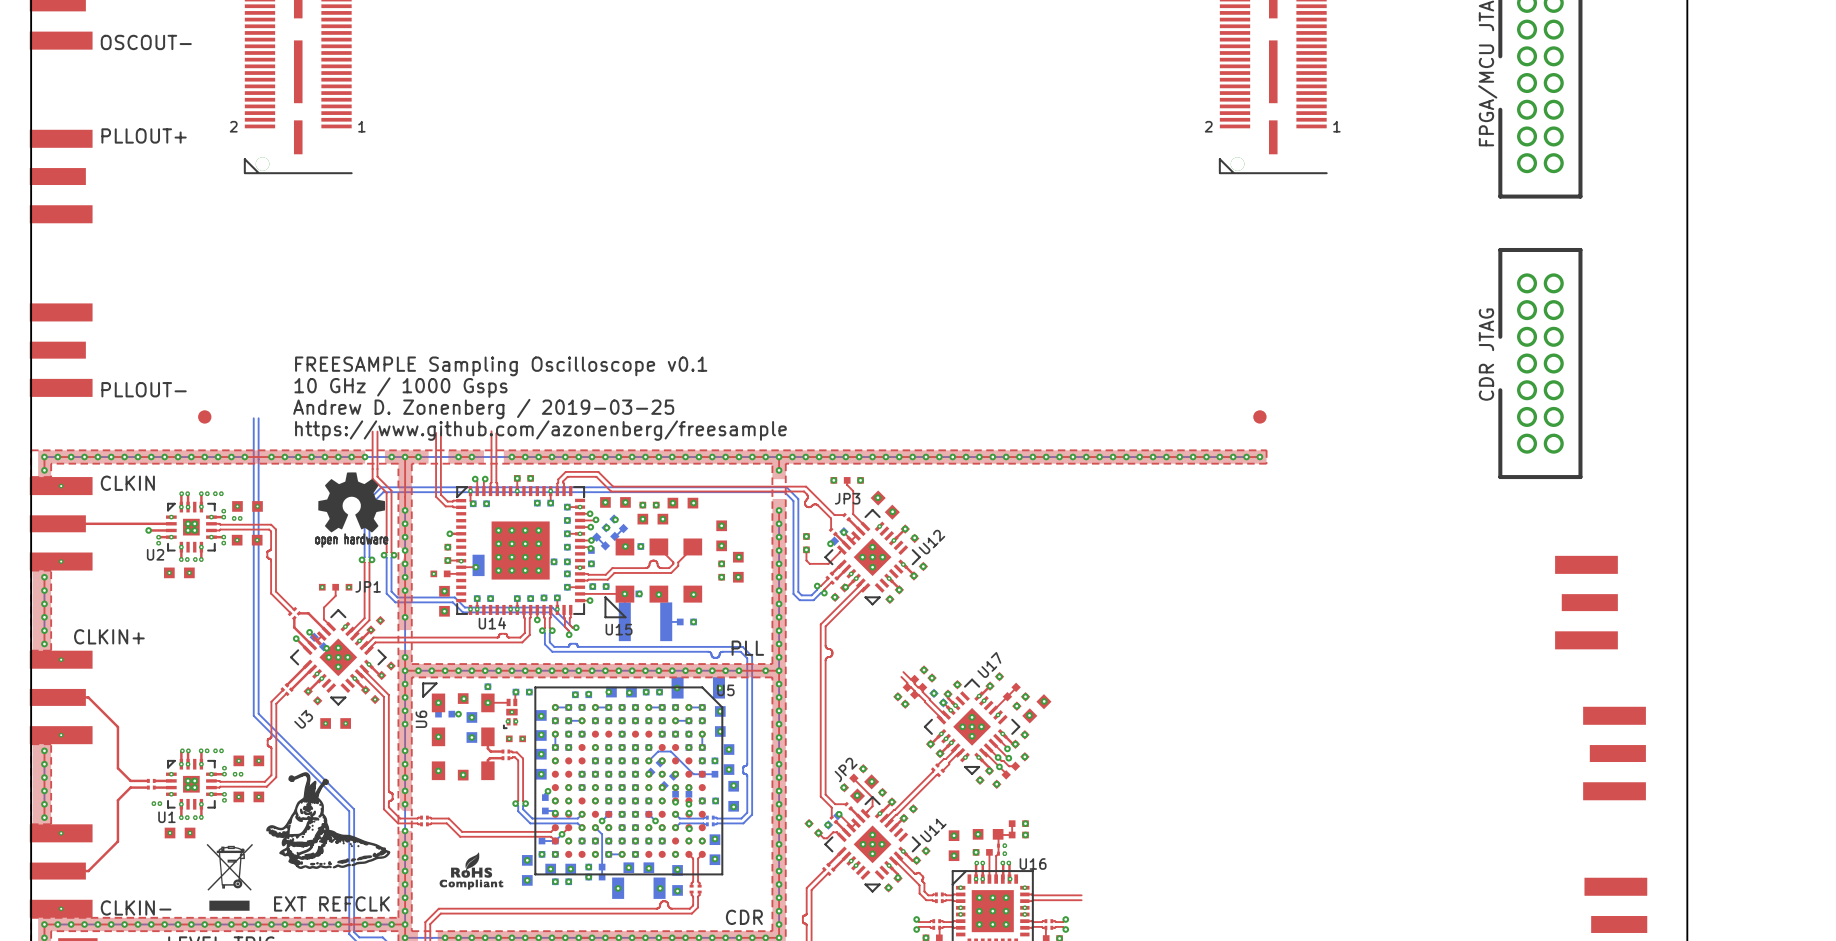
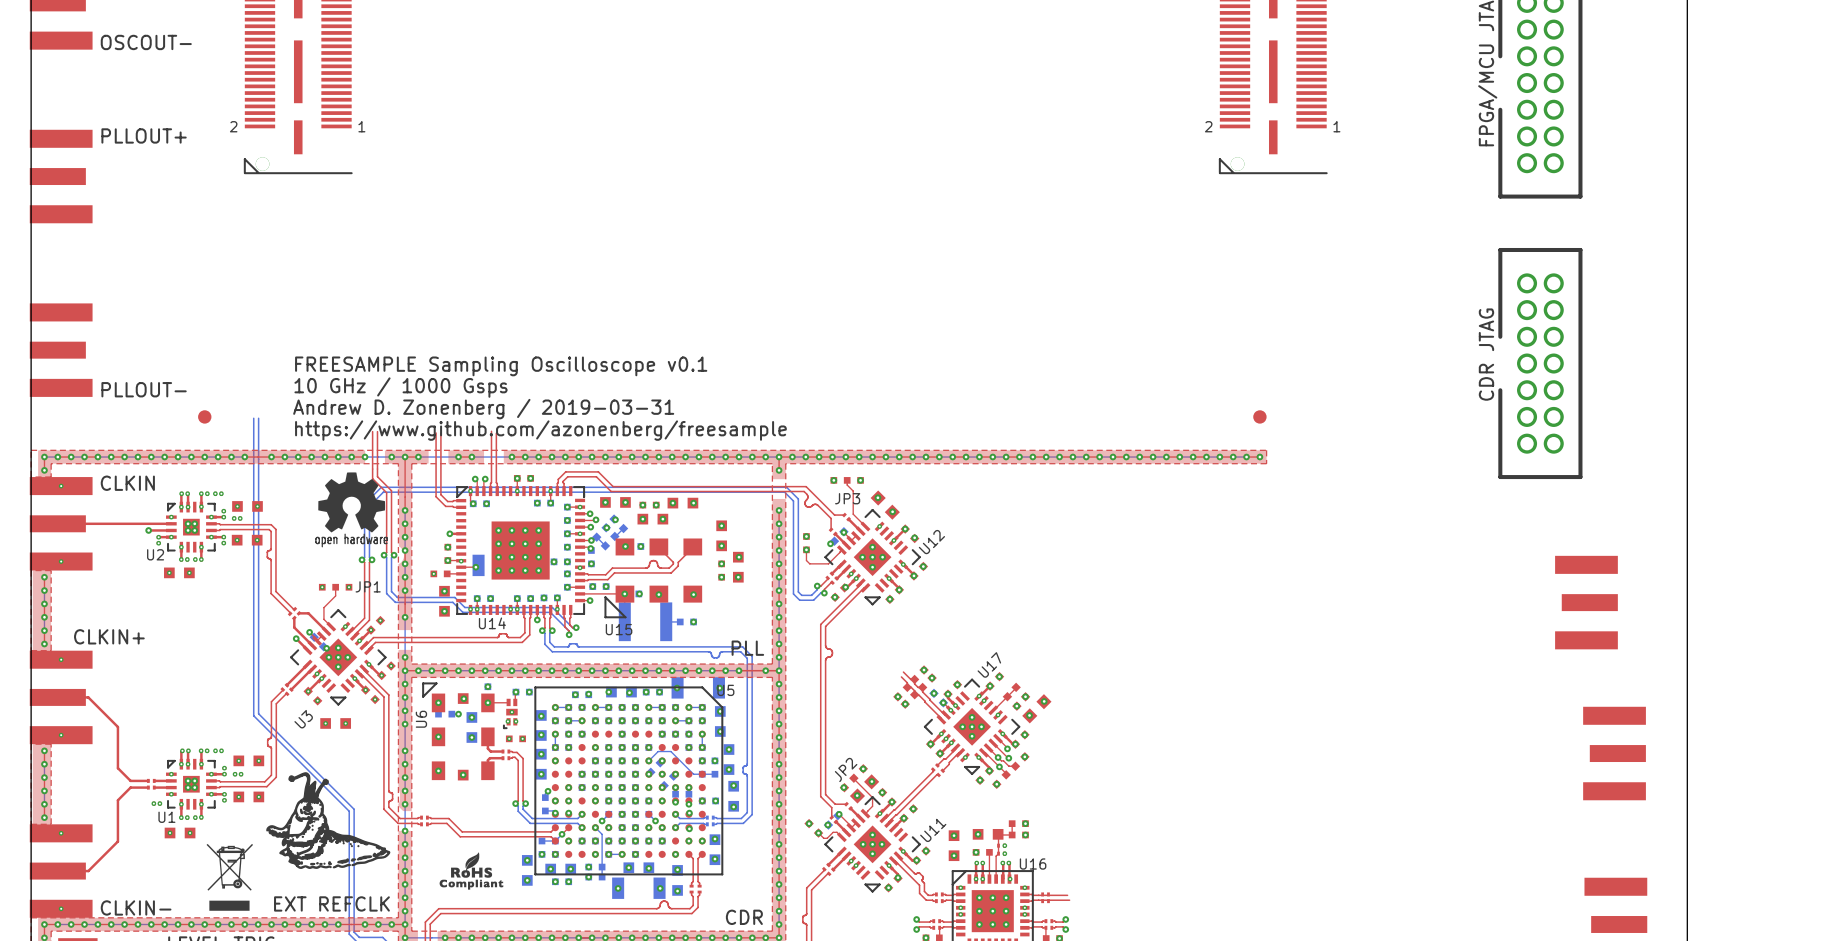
text: Andrew D. Zonenberg / 2019-03-25 (483, 409) -> Andrew D. Zonenberg / 2019-03-31 (483, 409)
part: none -> (1045, 894)
top track: (1067, 895) (1081, 895) -> none
top track: (1069, 900) (1081, 900) -> none
part: none -> (1045, 901)

